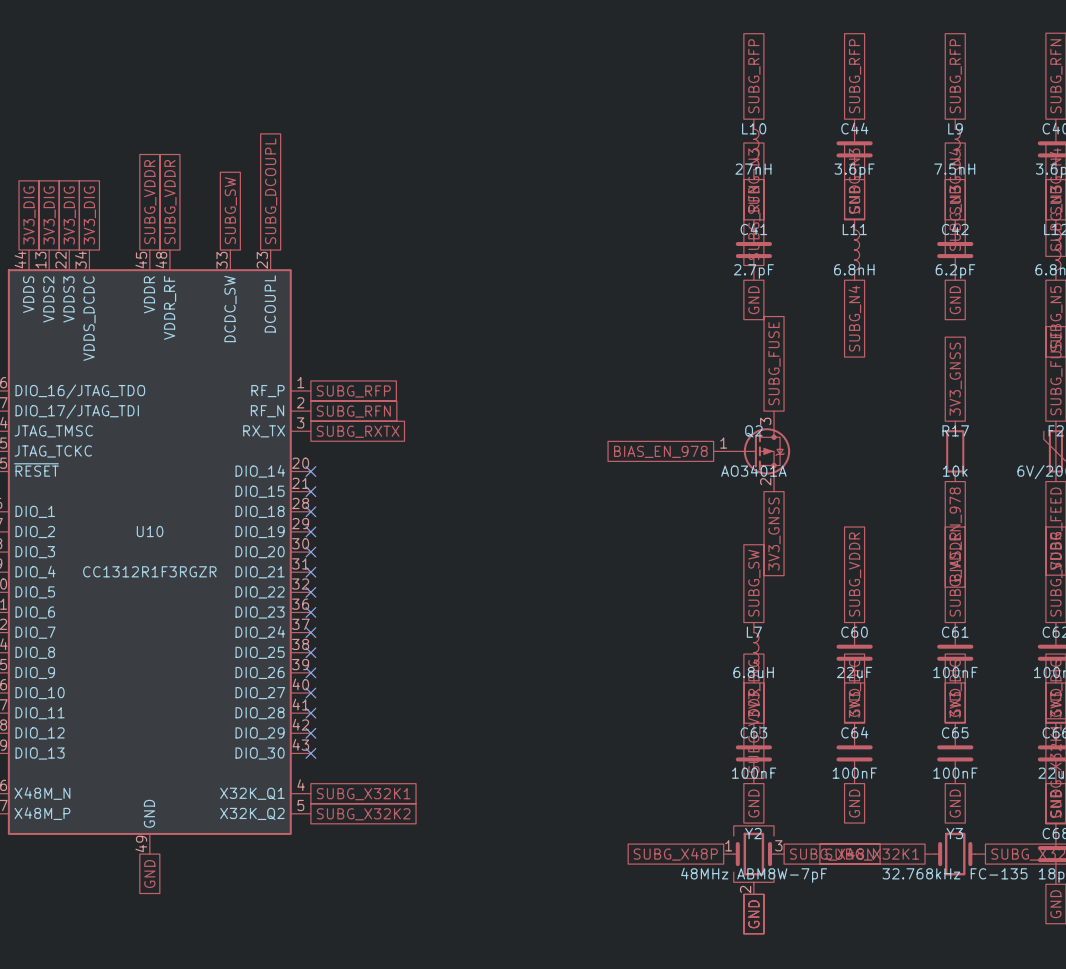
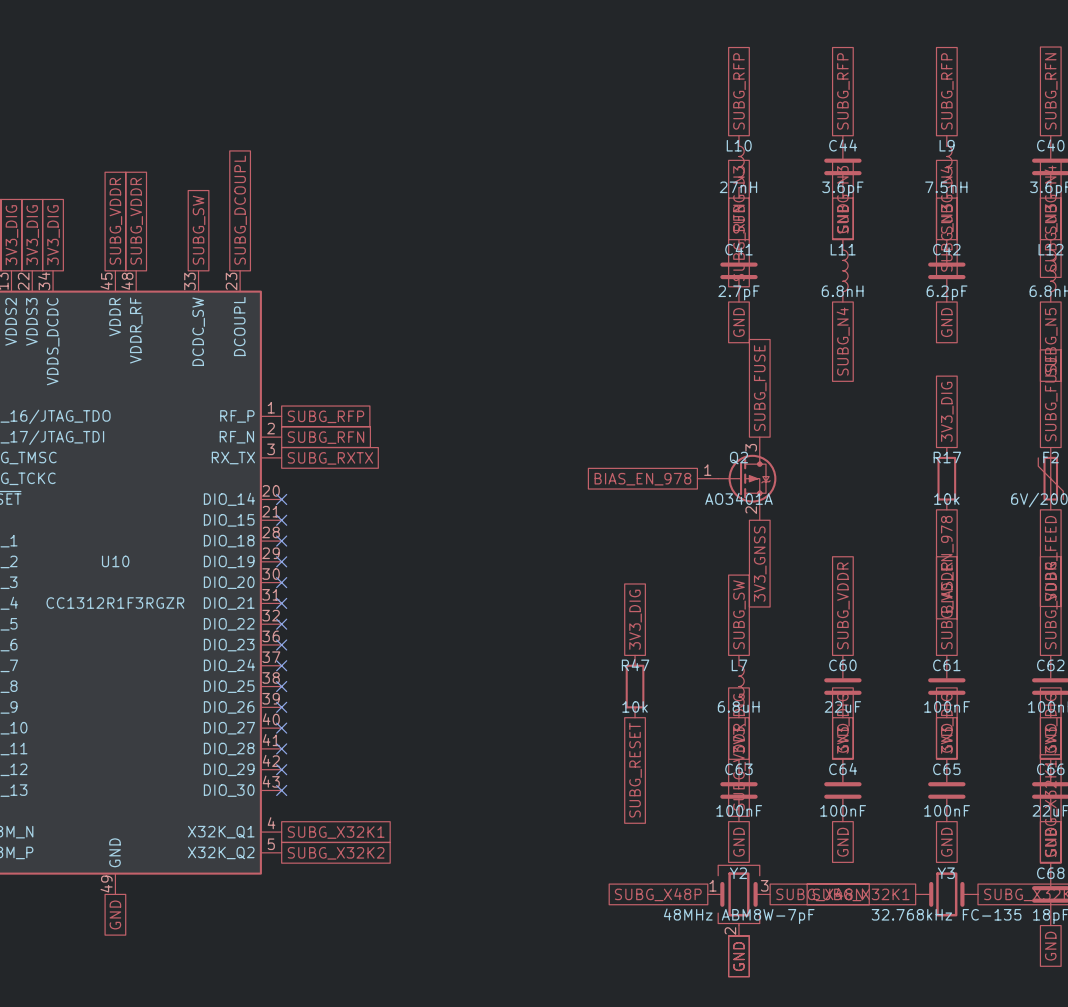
global label: 3V3_GNSS (955, 379) -> 3V3_DIG (947, 411)
global label: none -> 3V3_DIG (635, 619)
R47: none -> 10k (635, 686)
global label: none -> SUBG_RESET (635, 770)

